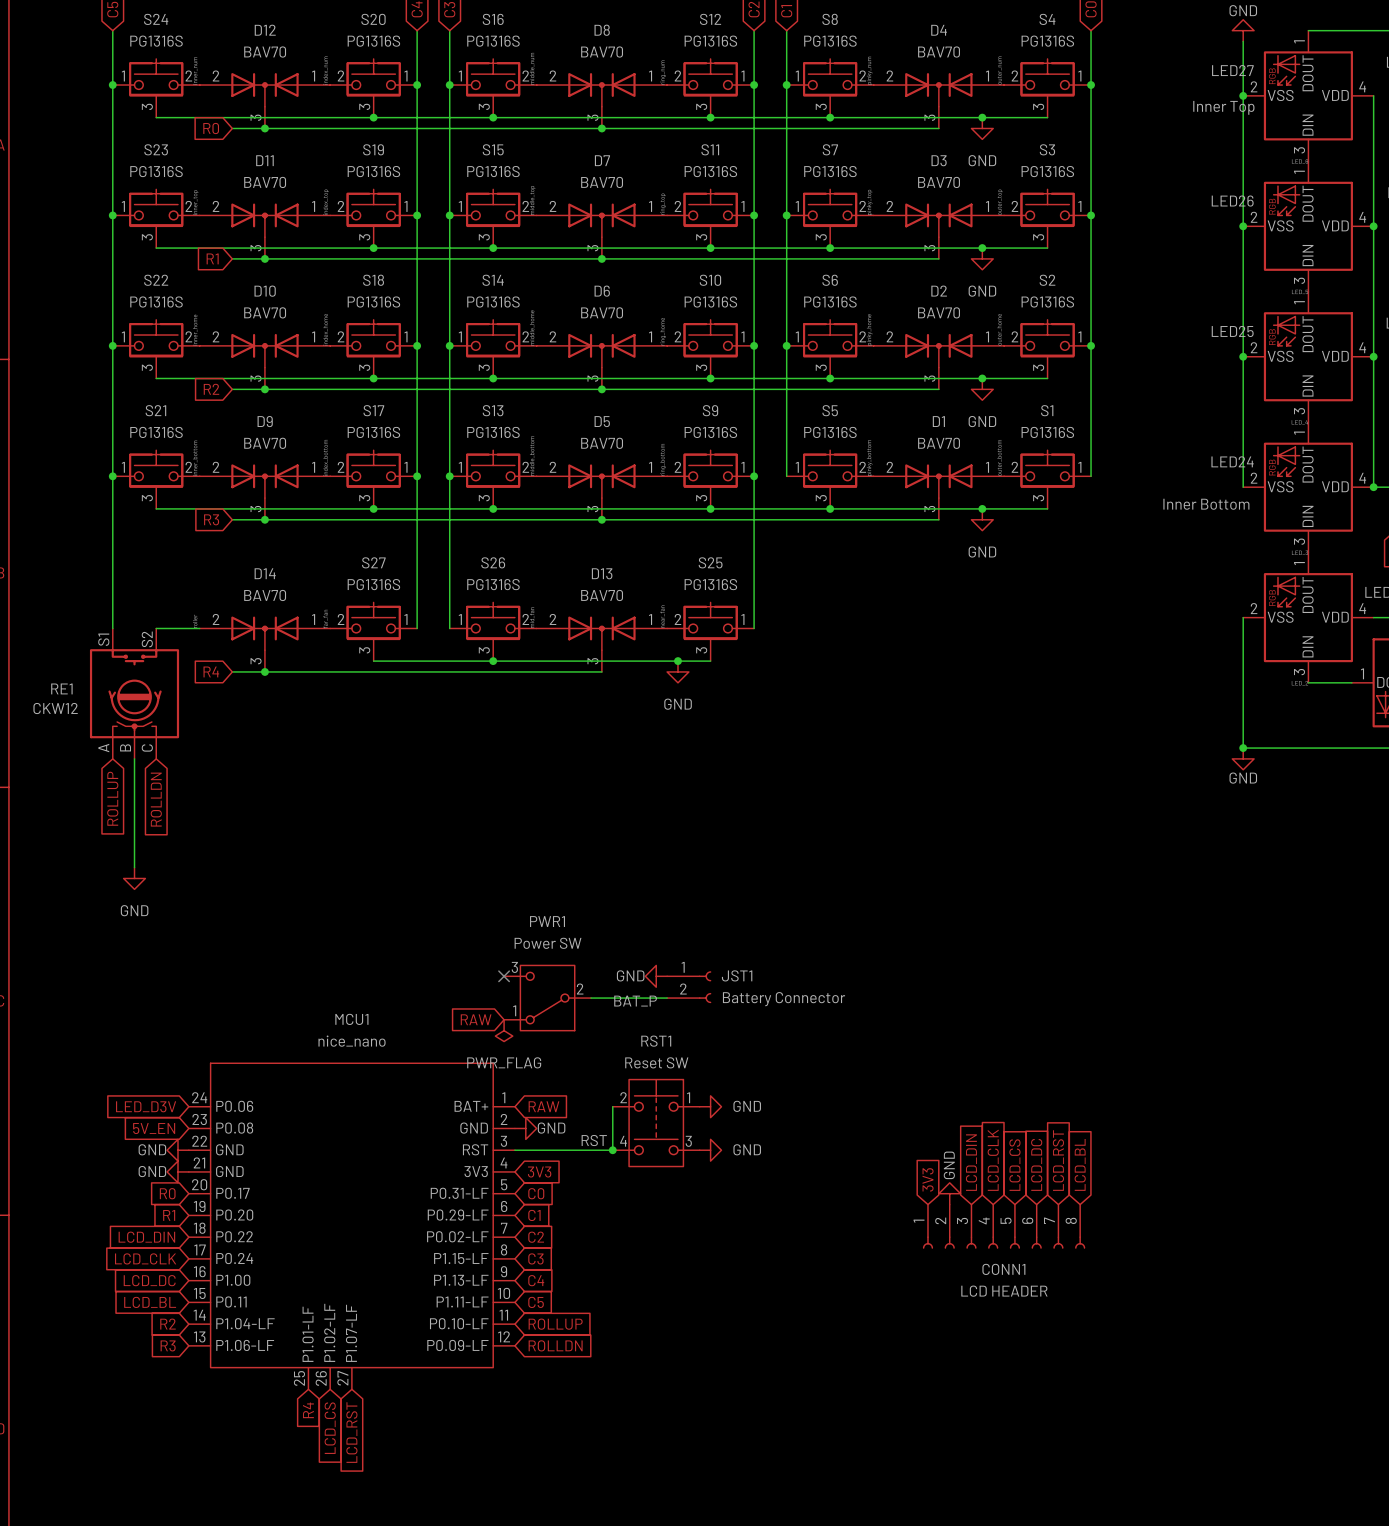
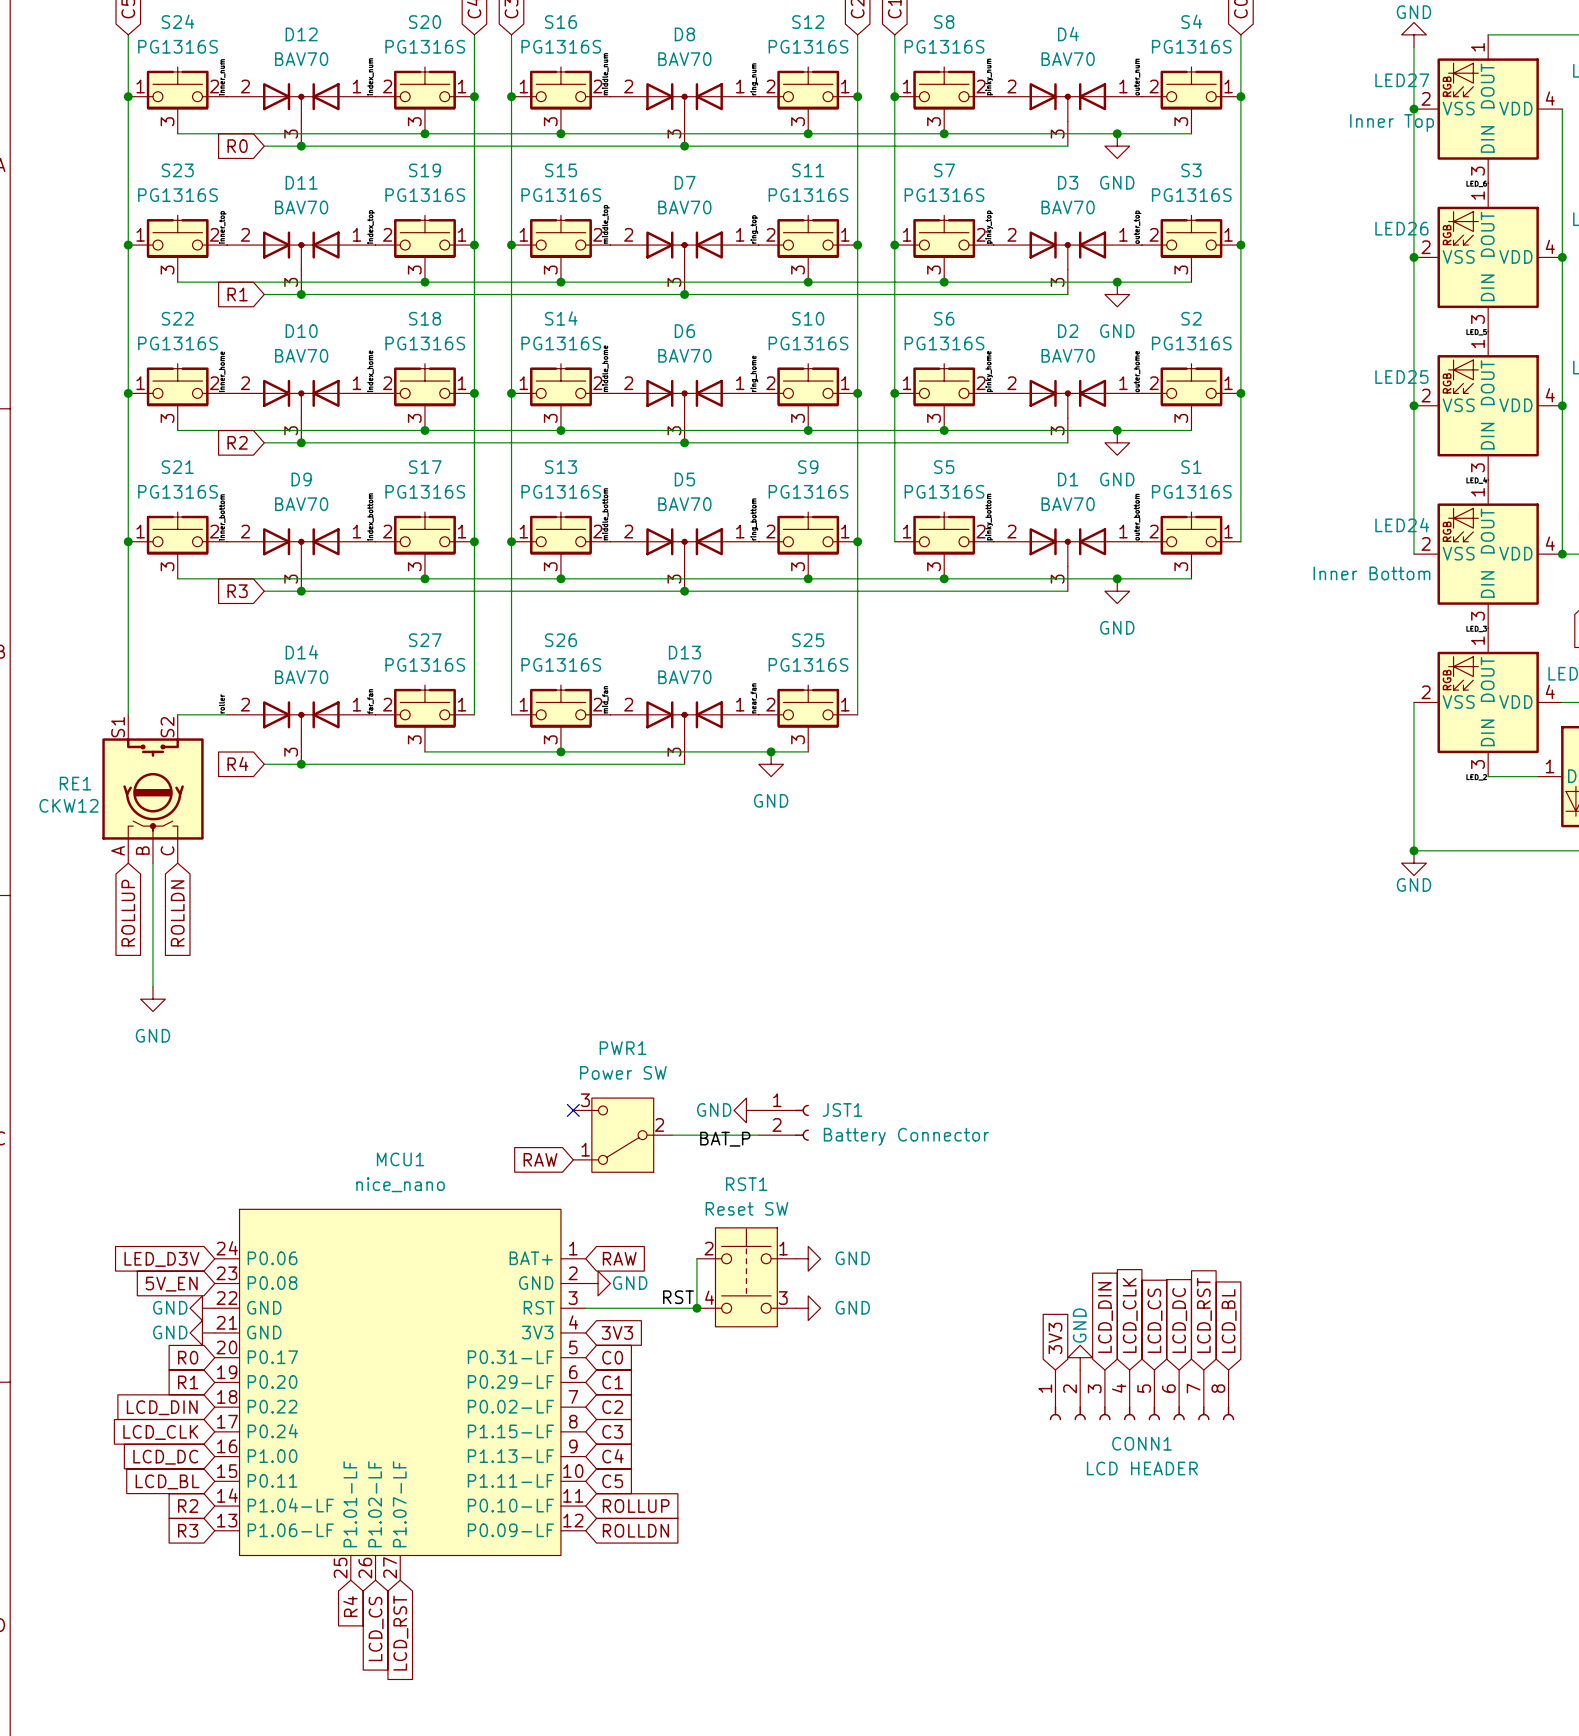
power symbol: PWR_FLAG (504, 1030) -> none

